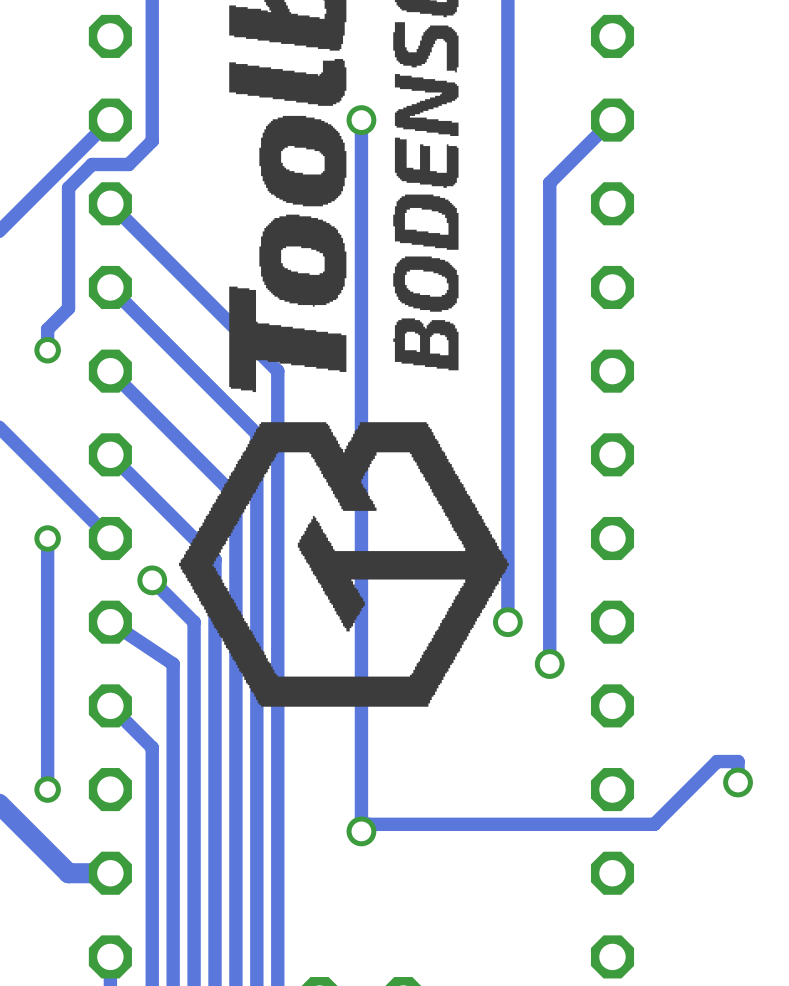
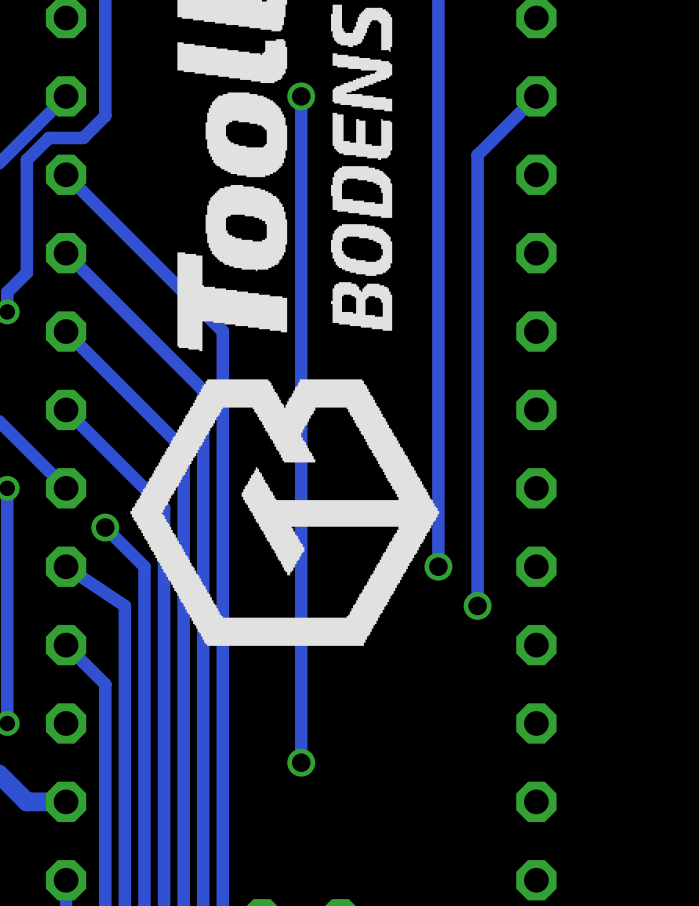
track: (738, 782) (738, 761) (717, 761) (654, 824) (368, 824) (361, 831) -> none
via: (738, 782) -> none

